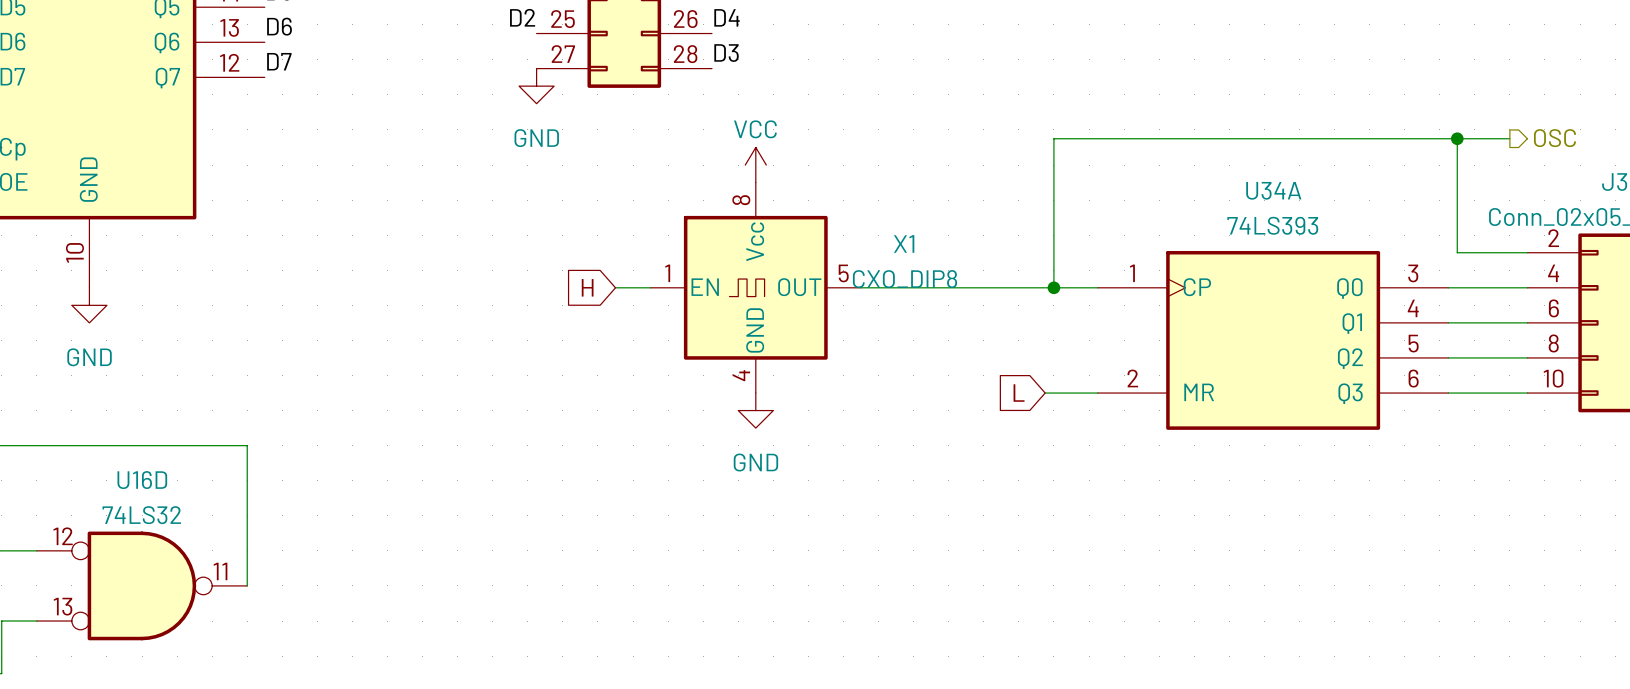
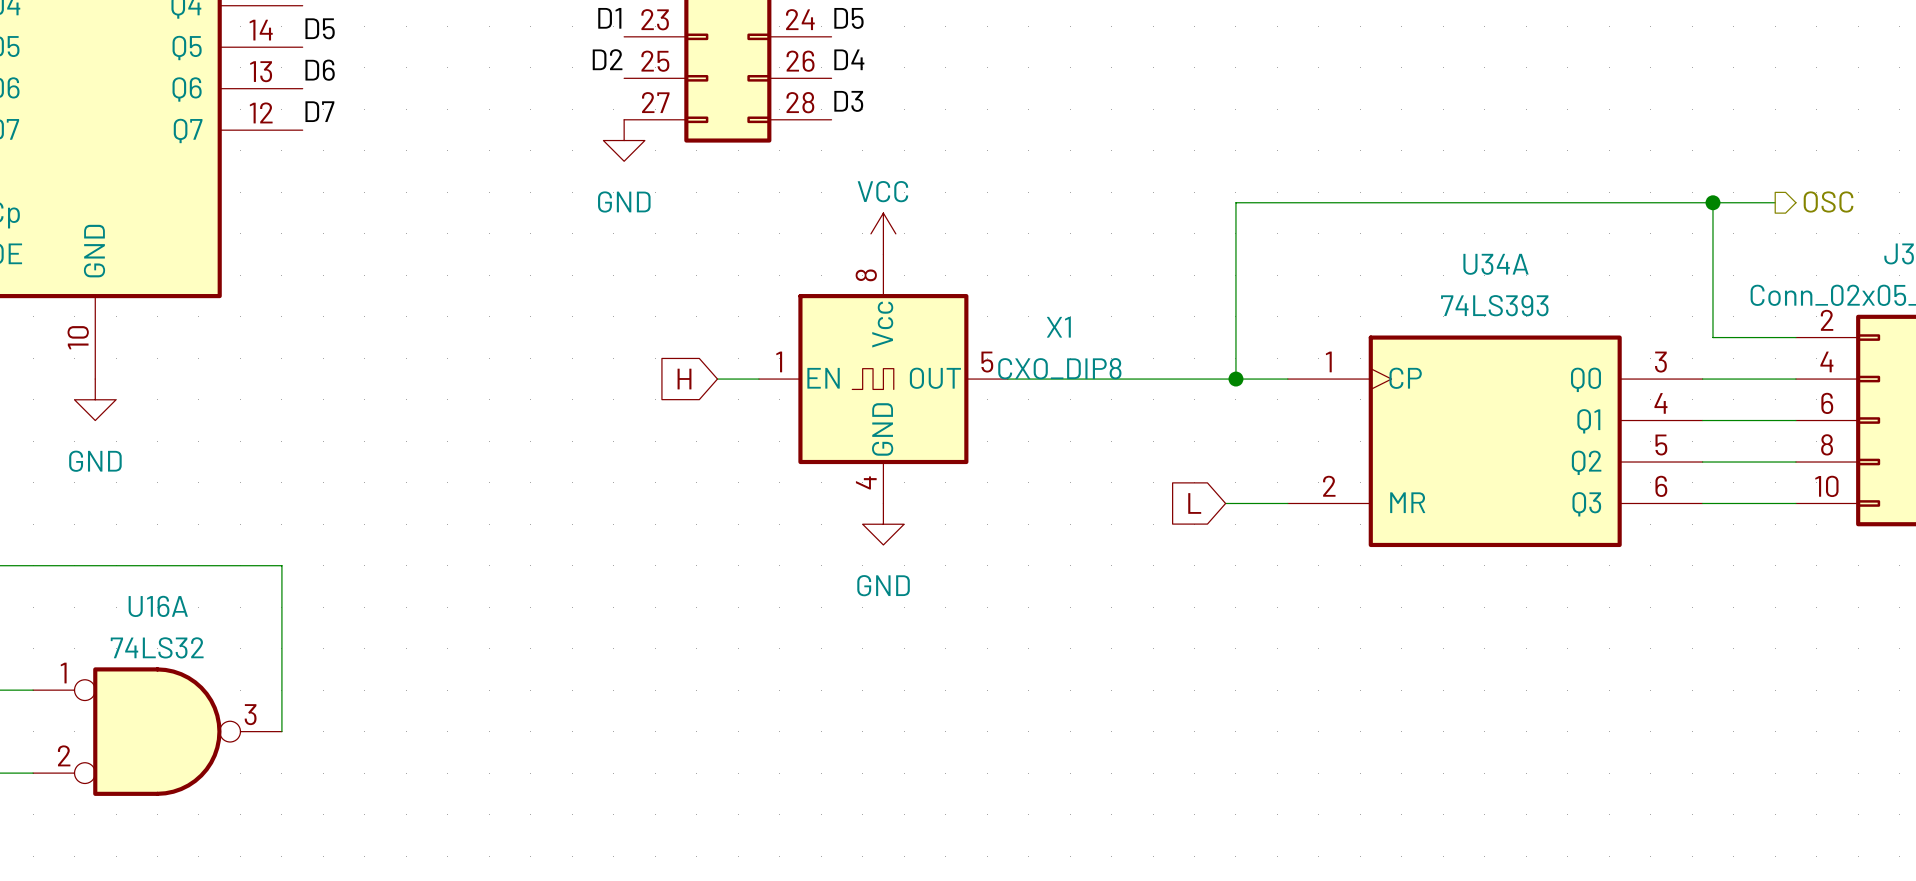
U16D name: U16D (142, 480) -> U16A (158, 606)
U16D pin number: 12 (63, 536) -> 1 (63, 673)
U16D pin number: 11 (220, 571) -> 3 (250, 714)
U16D pin number: 13 (63, 606) -> 2 (64, 755)

